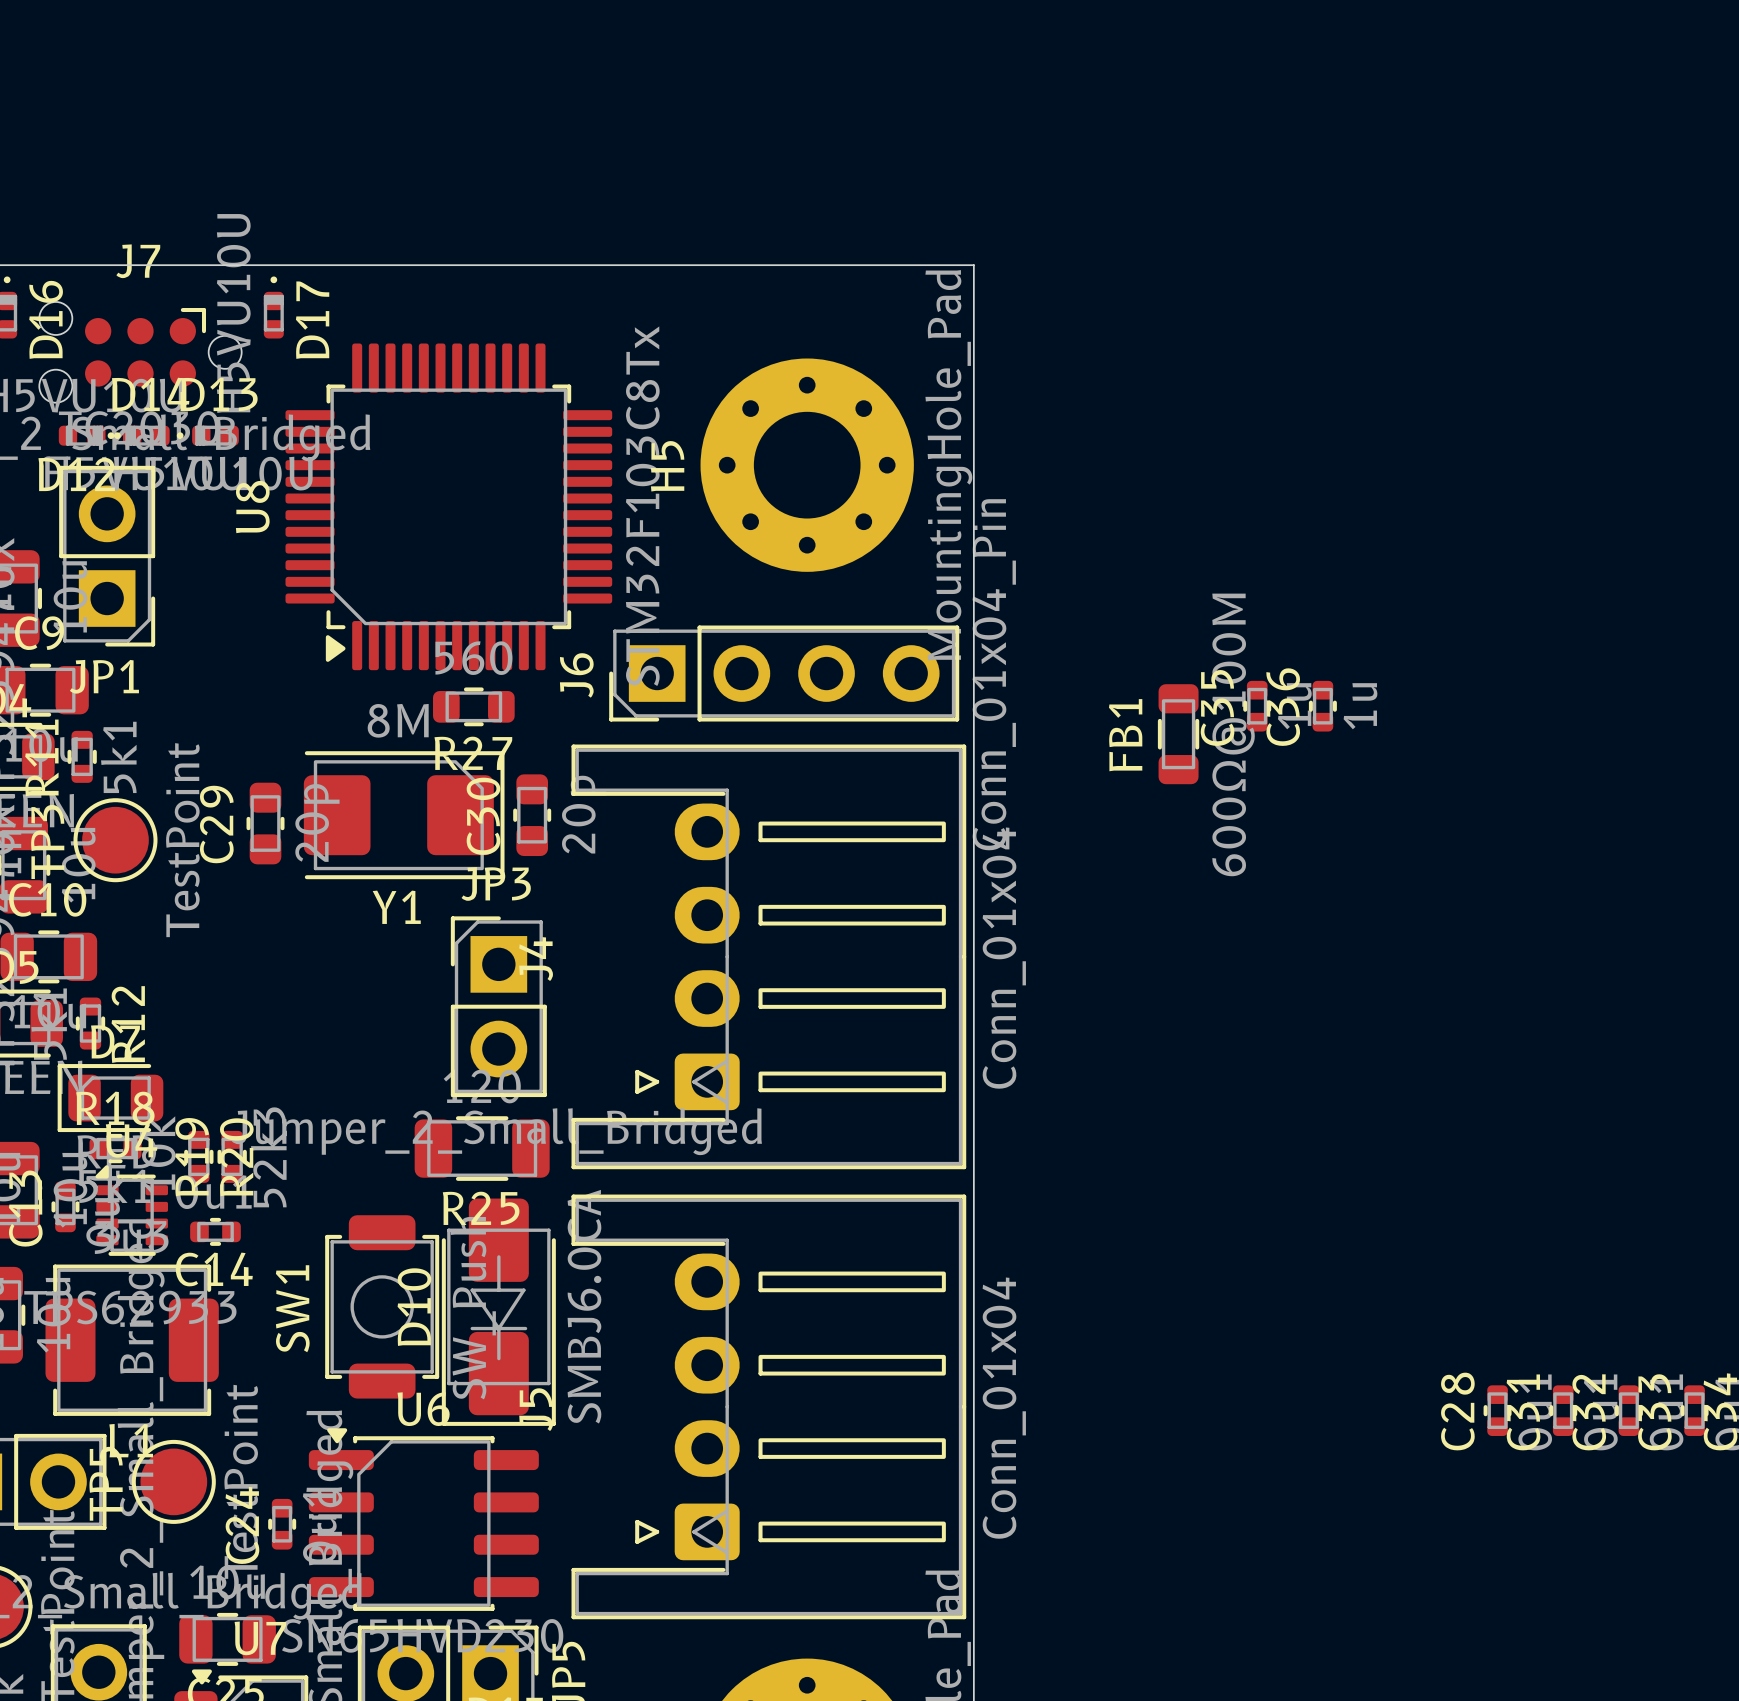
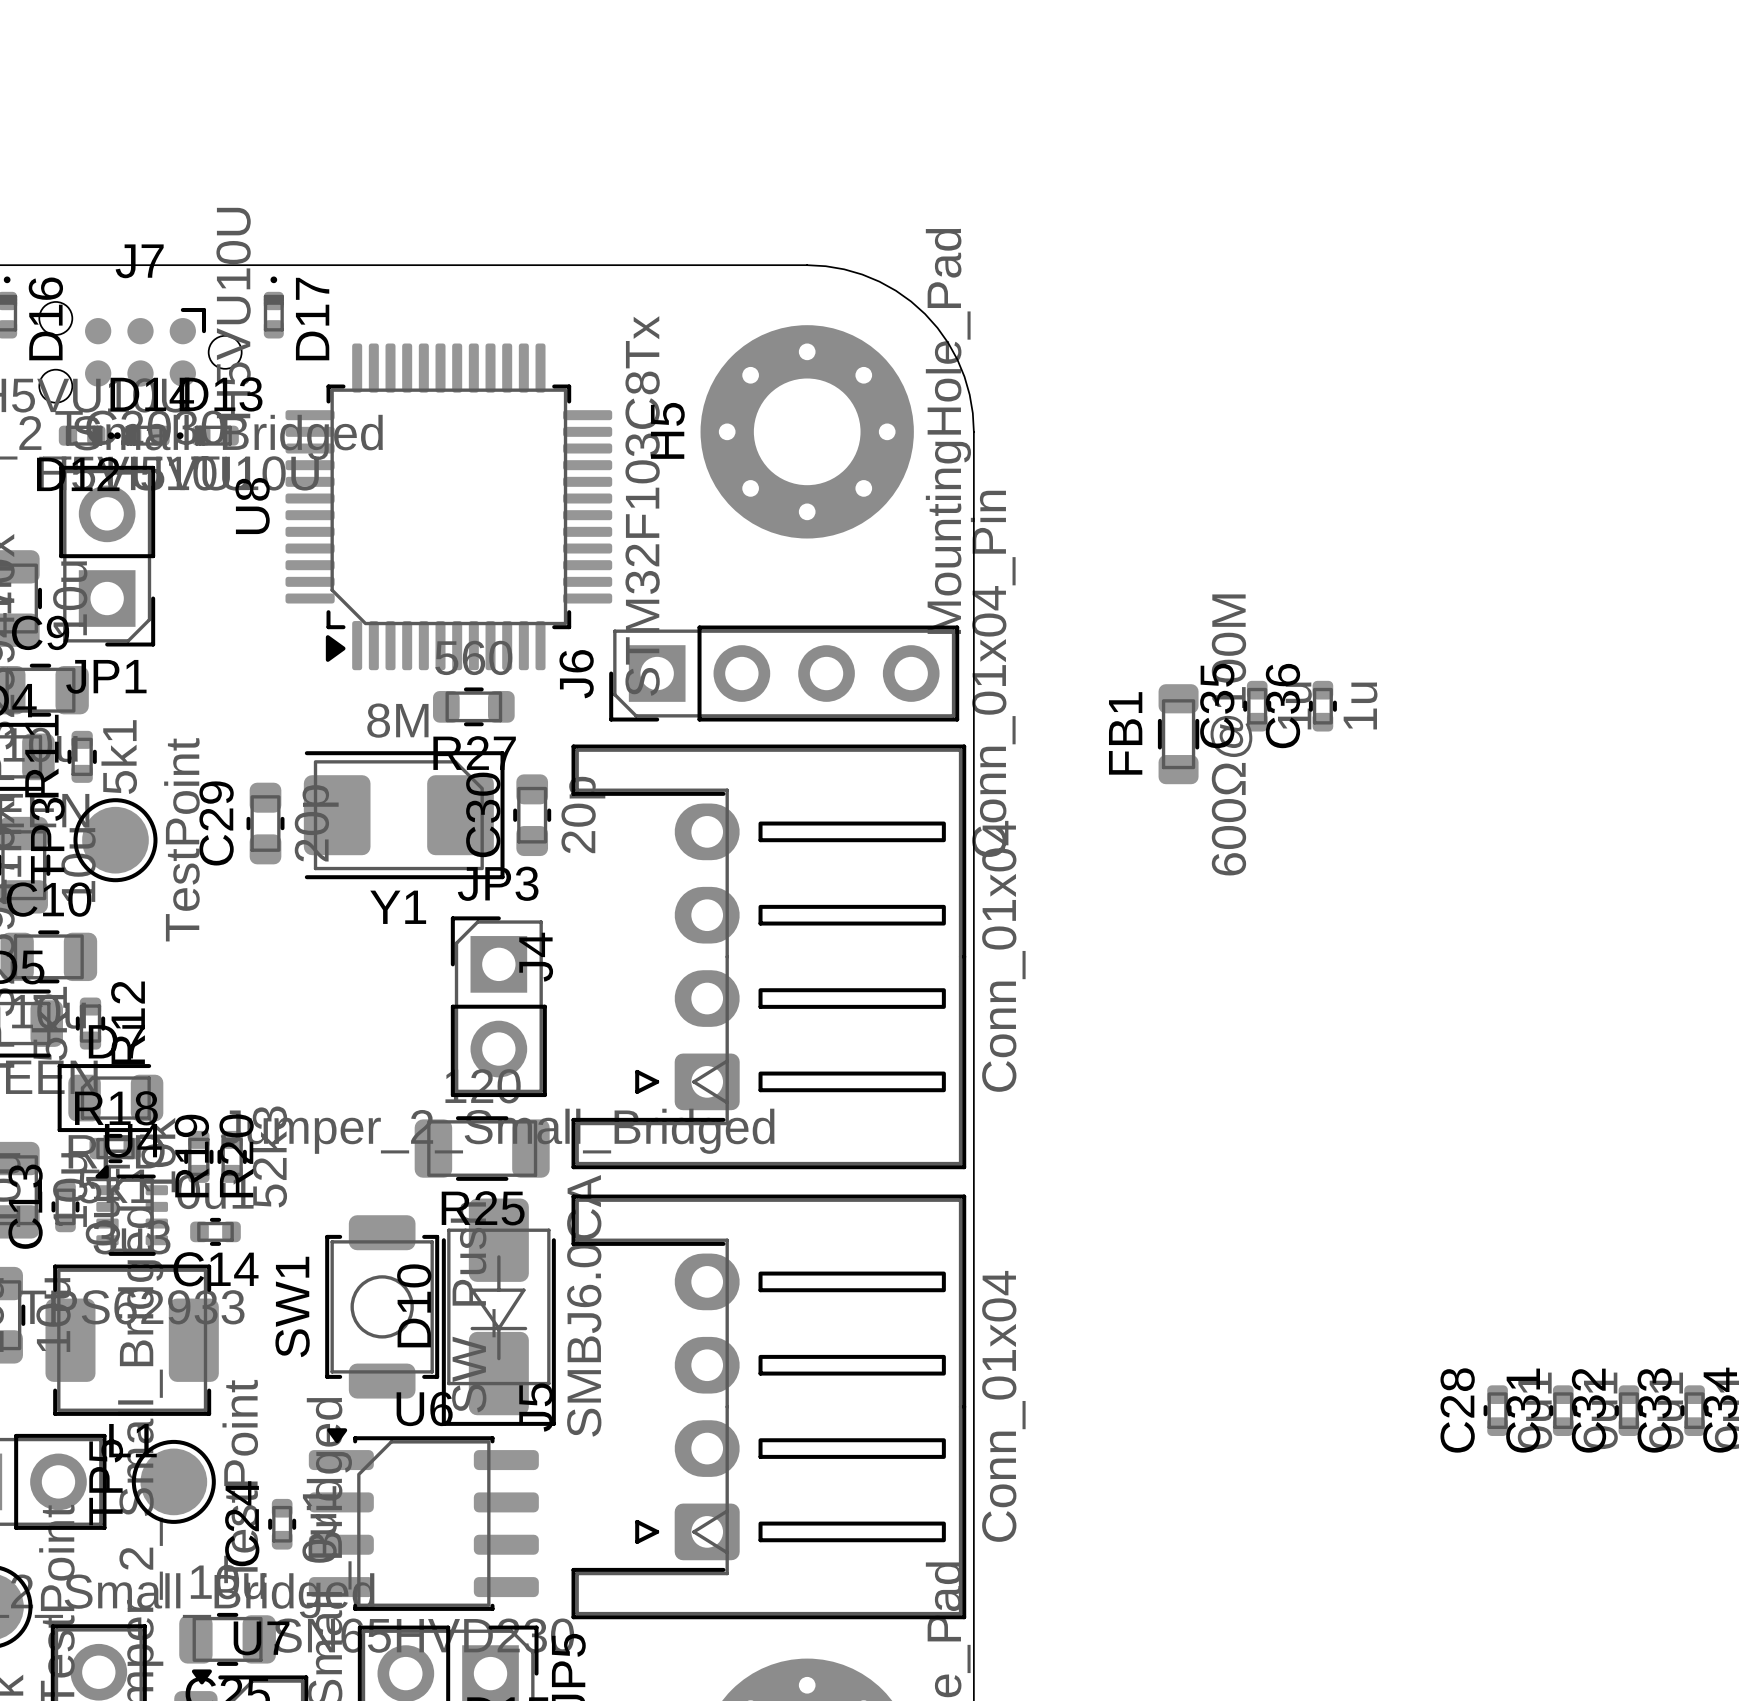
board edge: (807, 265) (973, 265) (973, 431) -> (807, 265) (844, 269) (879, 281) (895, 290) (925, 313) (948, 343) (964, 376) (972, 413) (973, 431)
H5 position: (807, 465) -> (807, 431)

